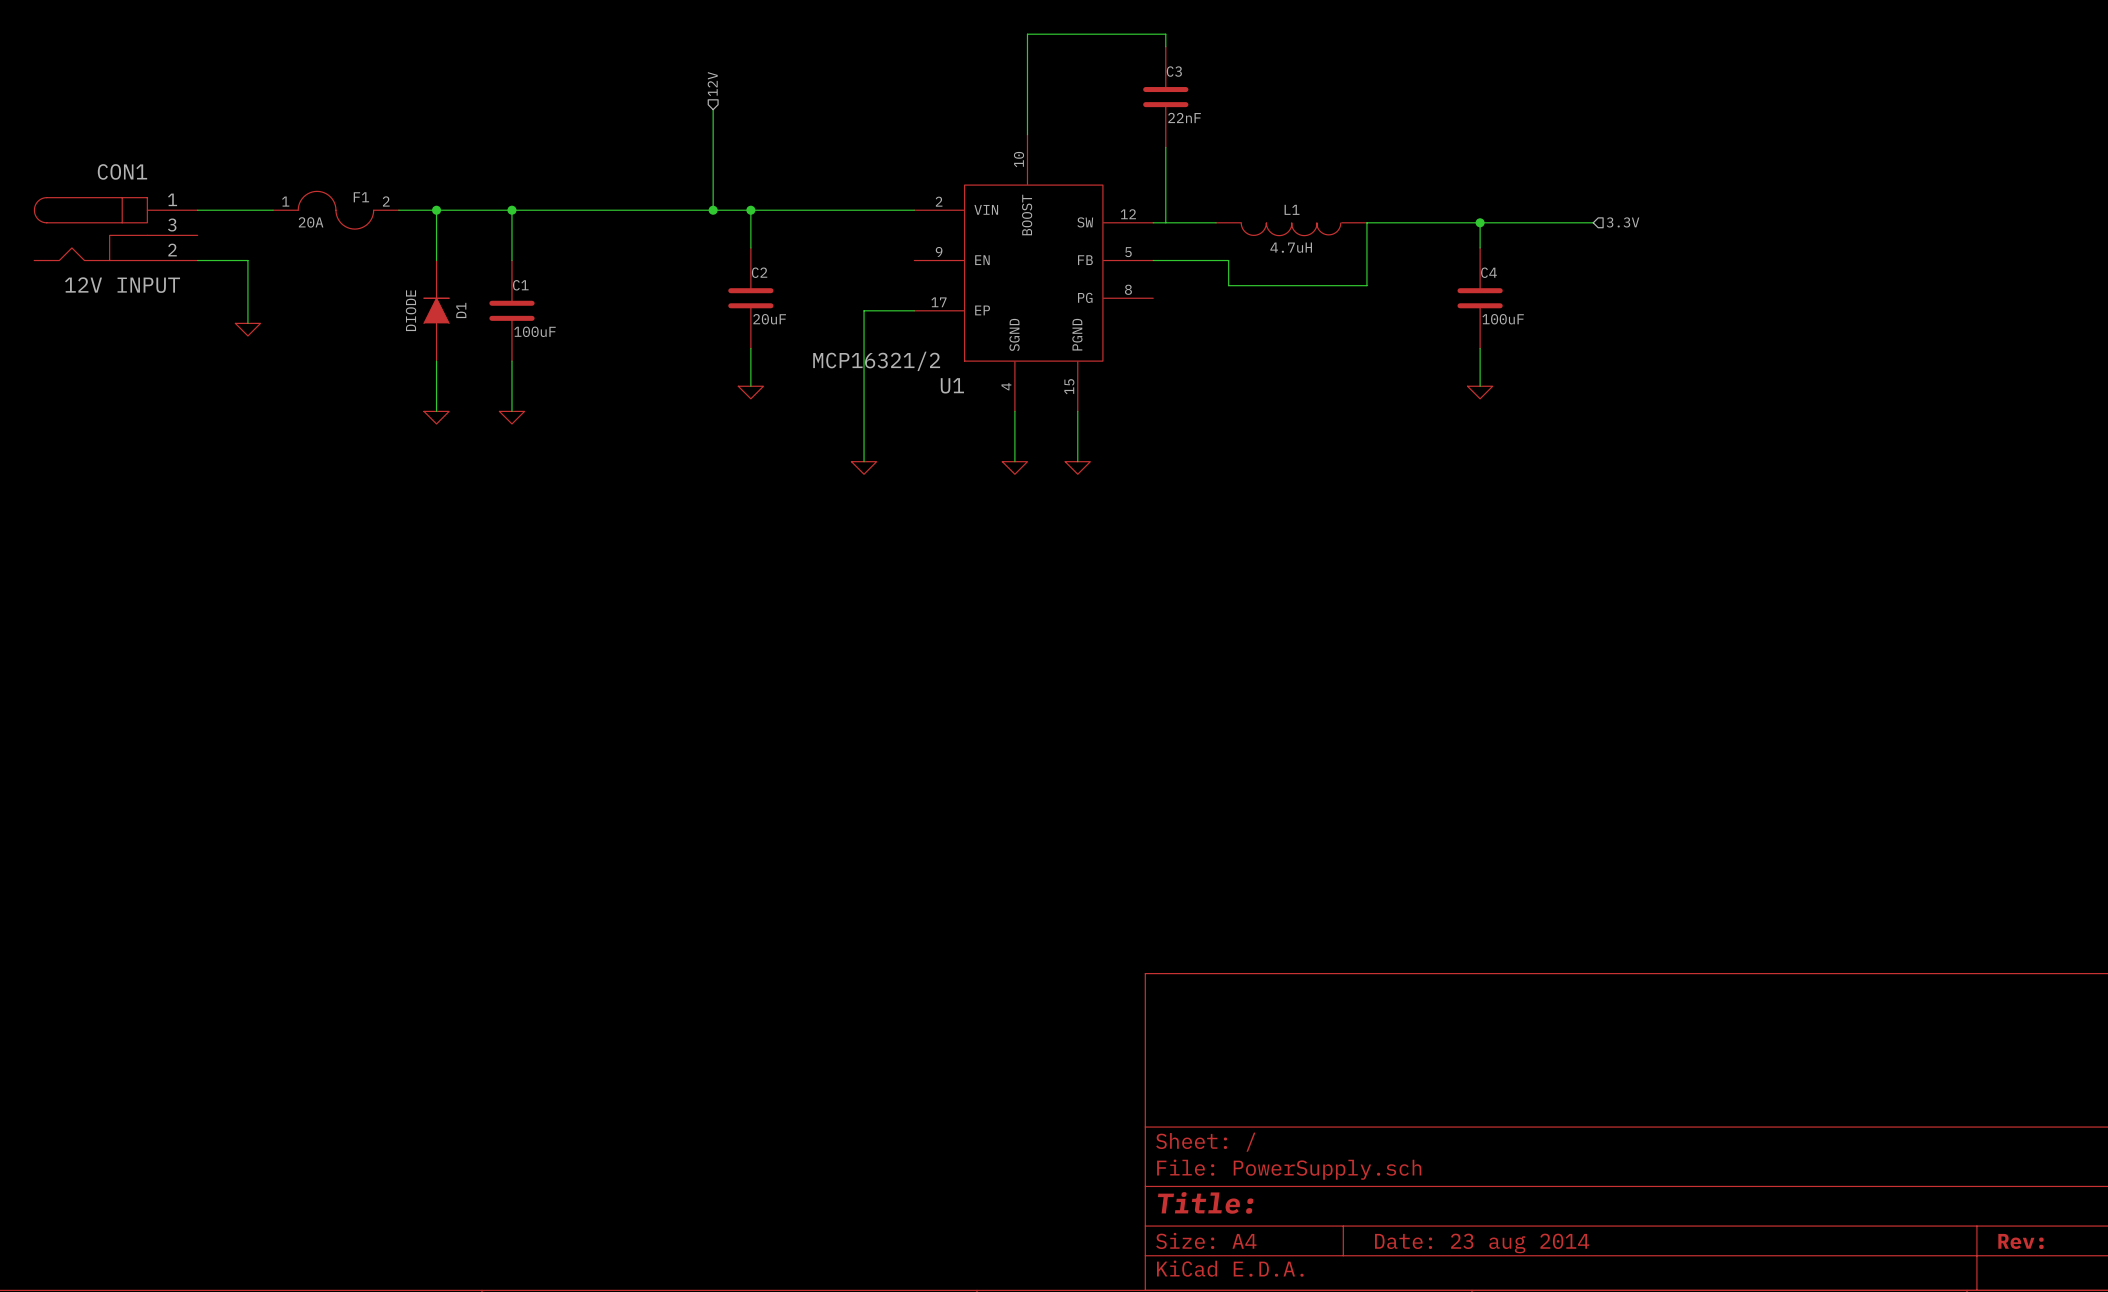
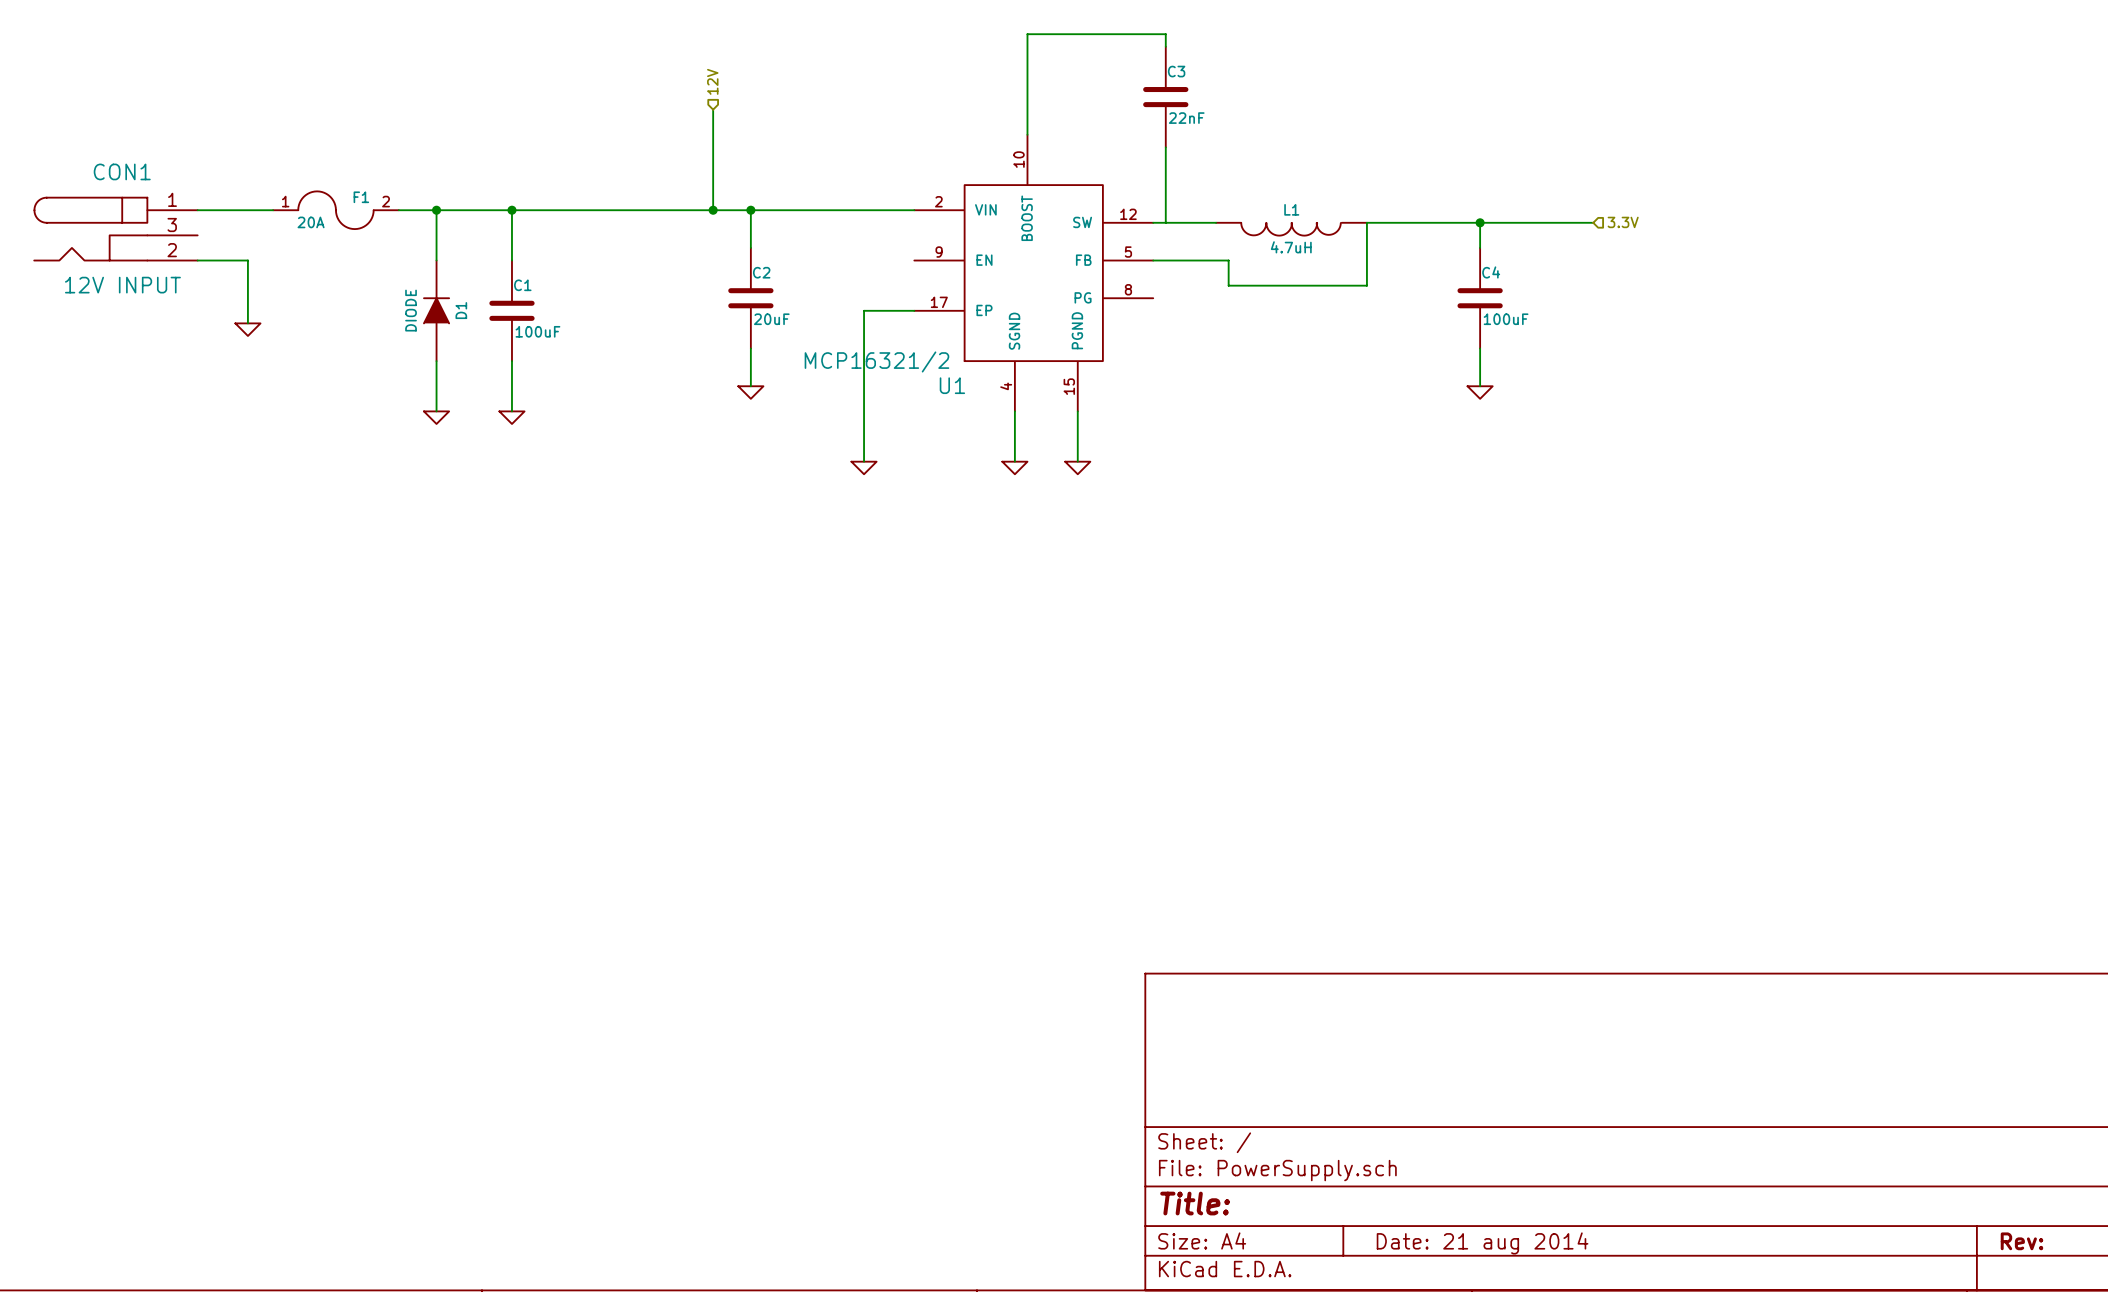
title block: Date: 23 aug 2014 (1482, 1243) -> Date: 21 aug 2014 (1482, 1243)

